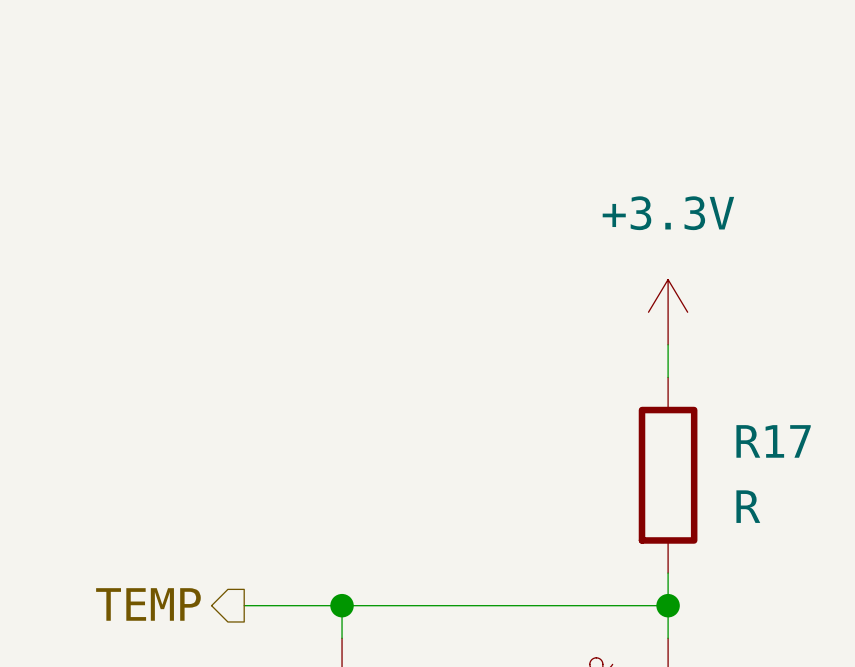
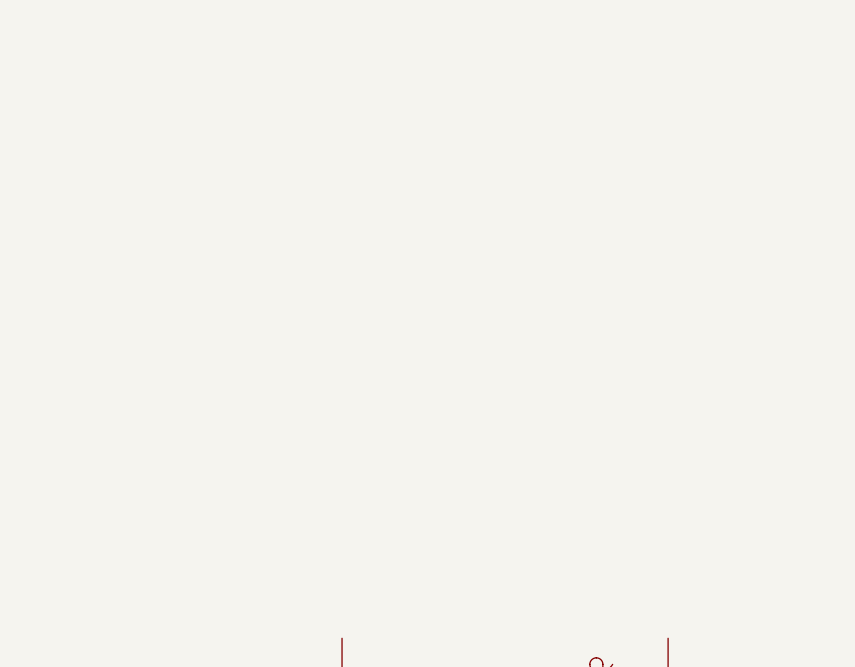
power symbol: +3.3V (668, 312) -> none
wire: (668, 344) (668, 377) -> none
R17: R (668, 475) -> none
wire: (668, 573) (668, 638) -> none
hierarchical label: TEMP (148, 604) -> none
wire: (244, 605) (668, 605) -> none
wire: (342, 605) (342, 638) -> none
junction: (342, 605) -> none
junction: (668, 605) -> none

